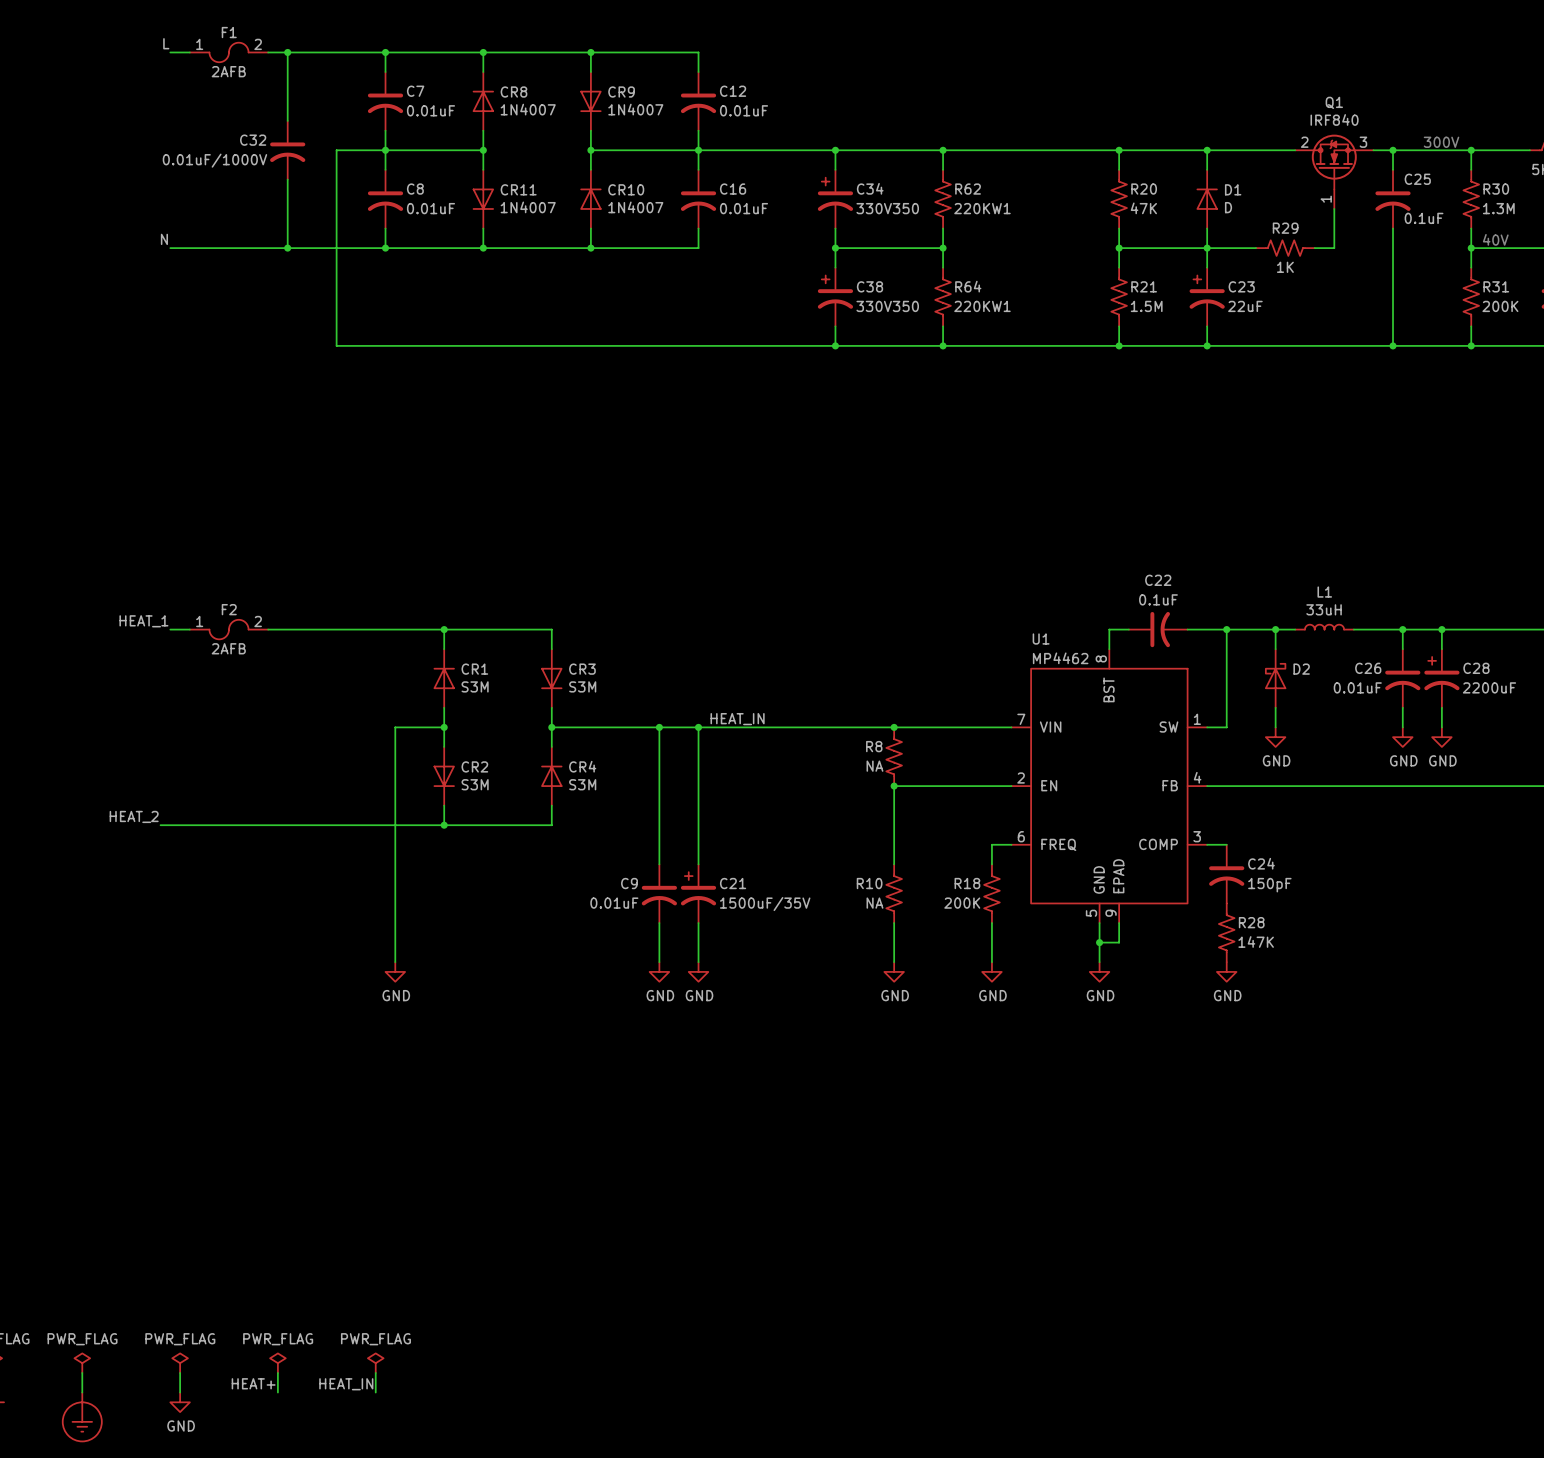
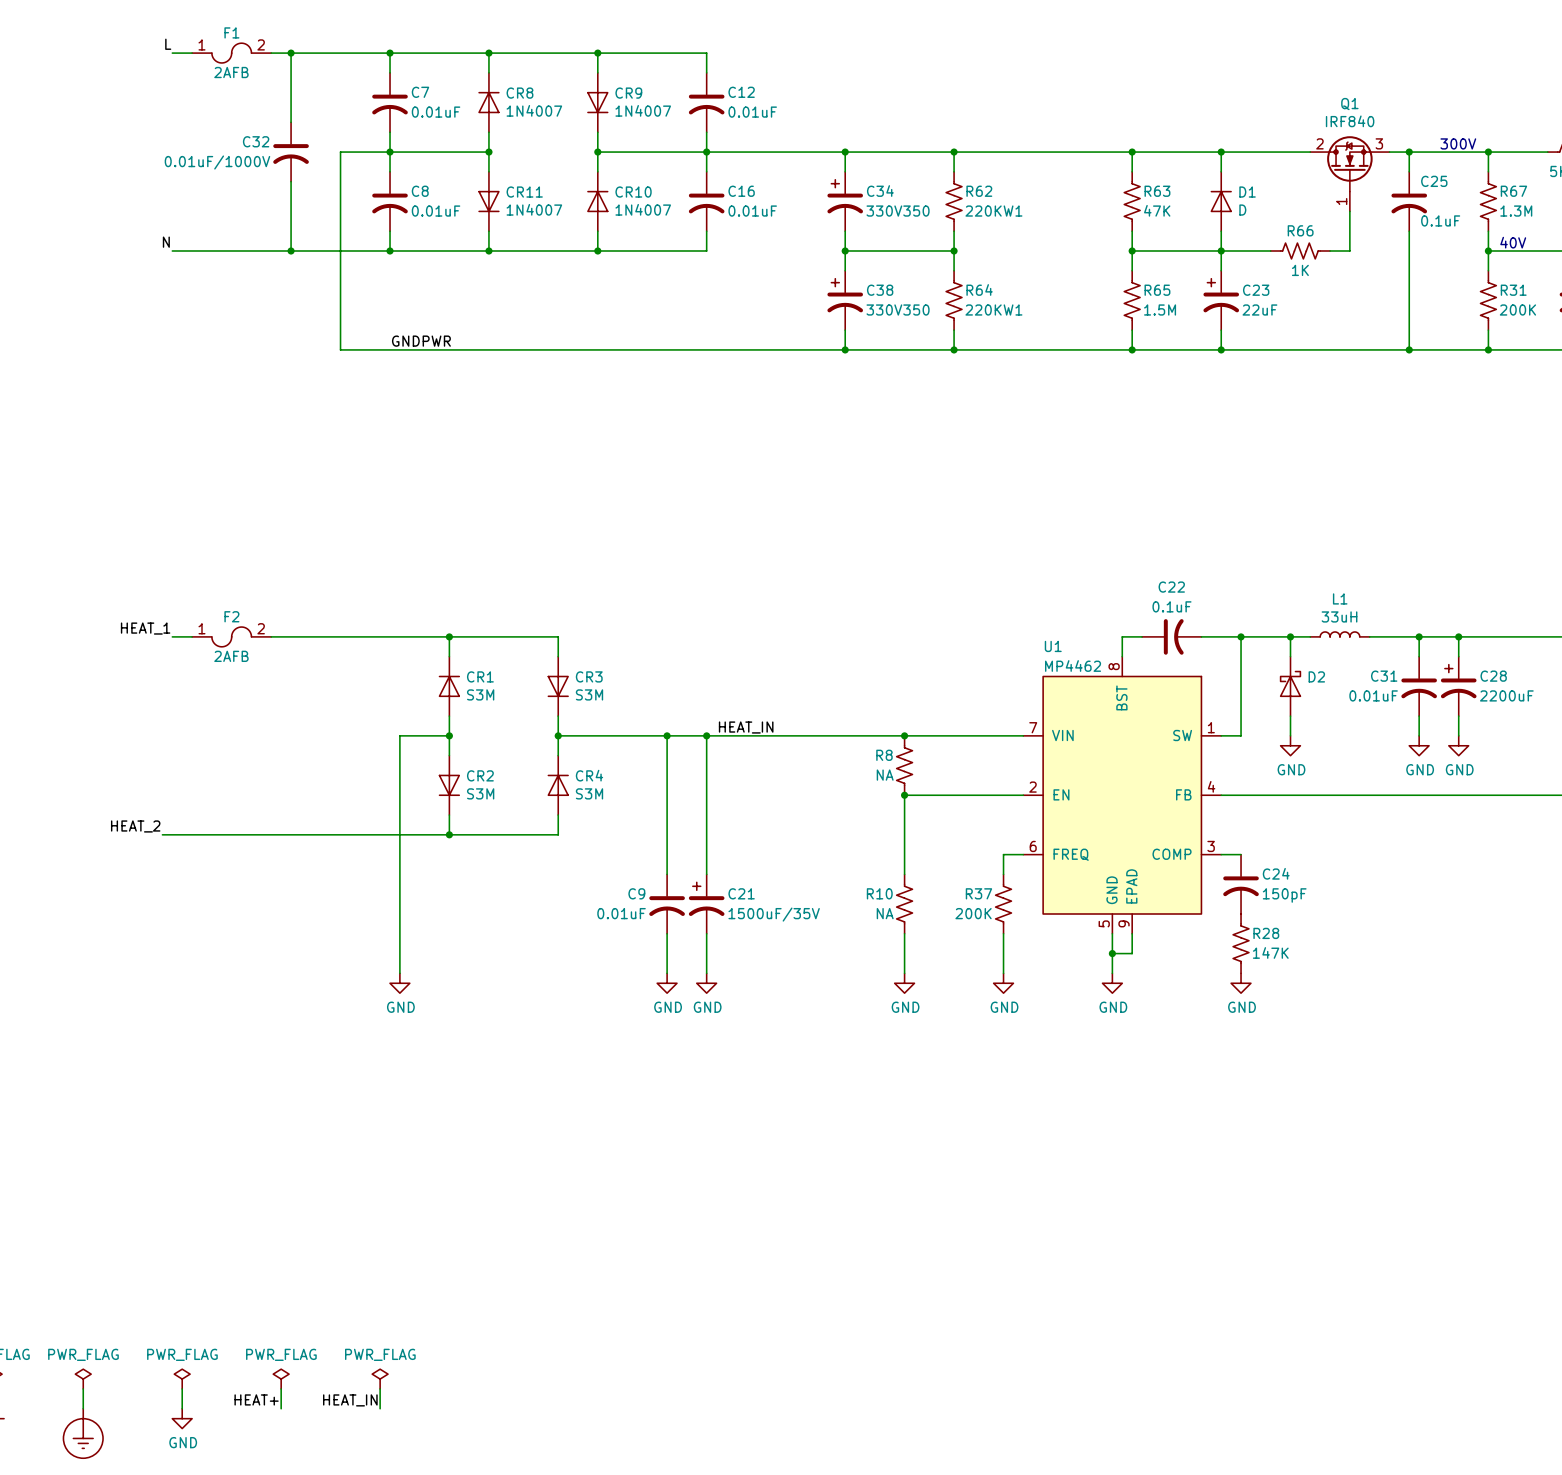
R20 name: R20 (1144, 189) -> R63 (1157, 191)
R30 name: R30 (1496, 189) -> R67 (1513, 191)
R29 name: R29 (1285, 228) -> R66 (1300, 230)
R21 name: R21 (1144, 286) -> R65 (1157, 290)
label: none -> GNDPWR (421, 341)
C26 name: C26 (1368, 668) -> C31 (1384, 676)
R18 name: R18 (967, 883) -> R37 (978, 893)

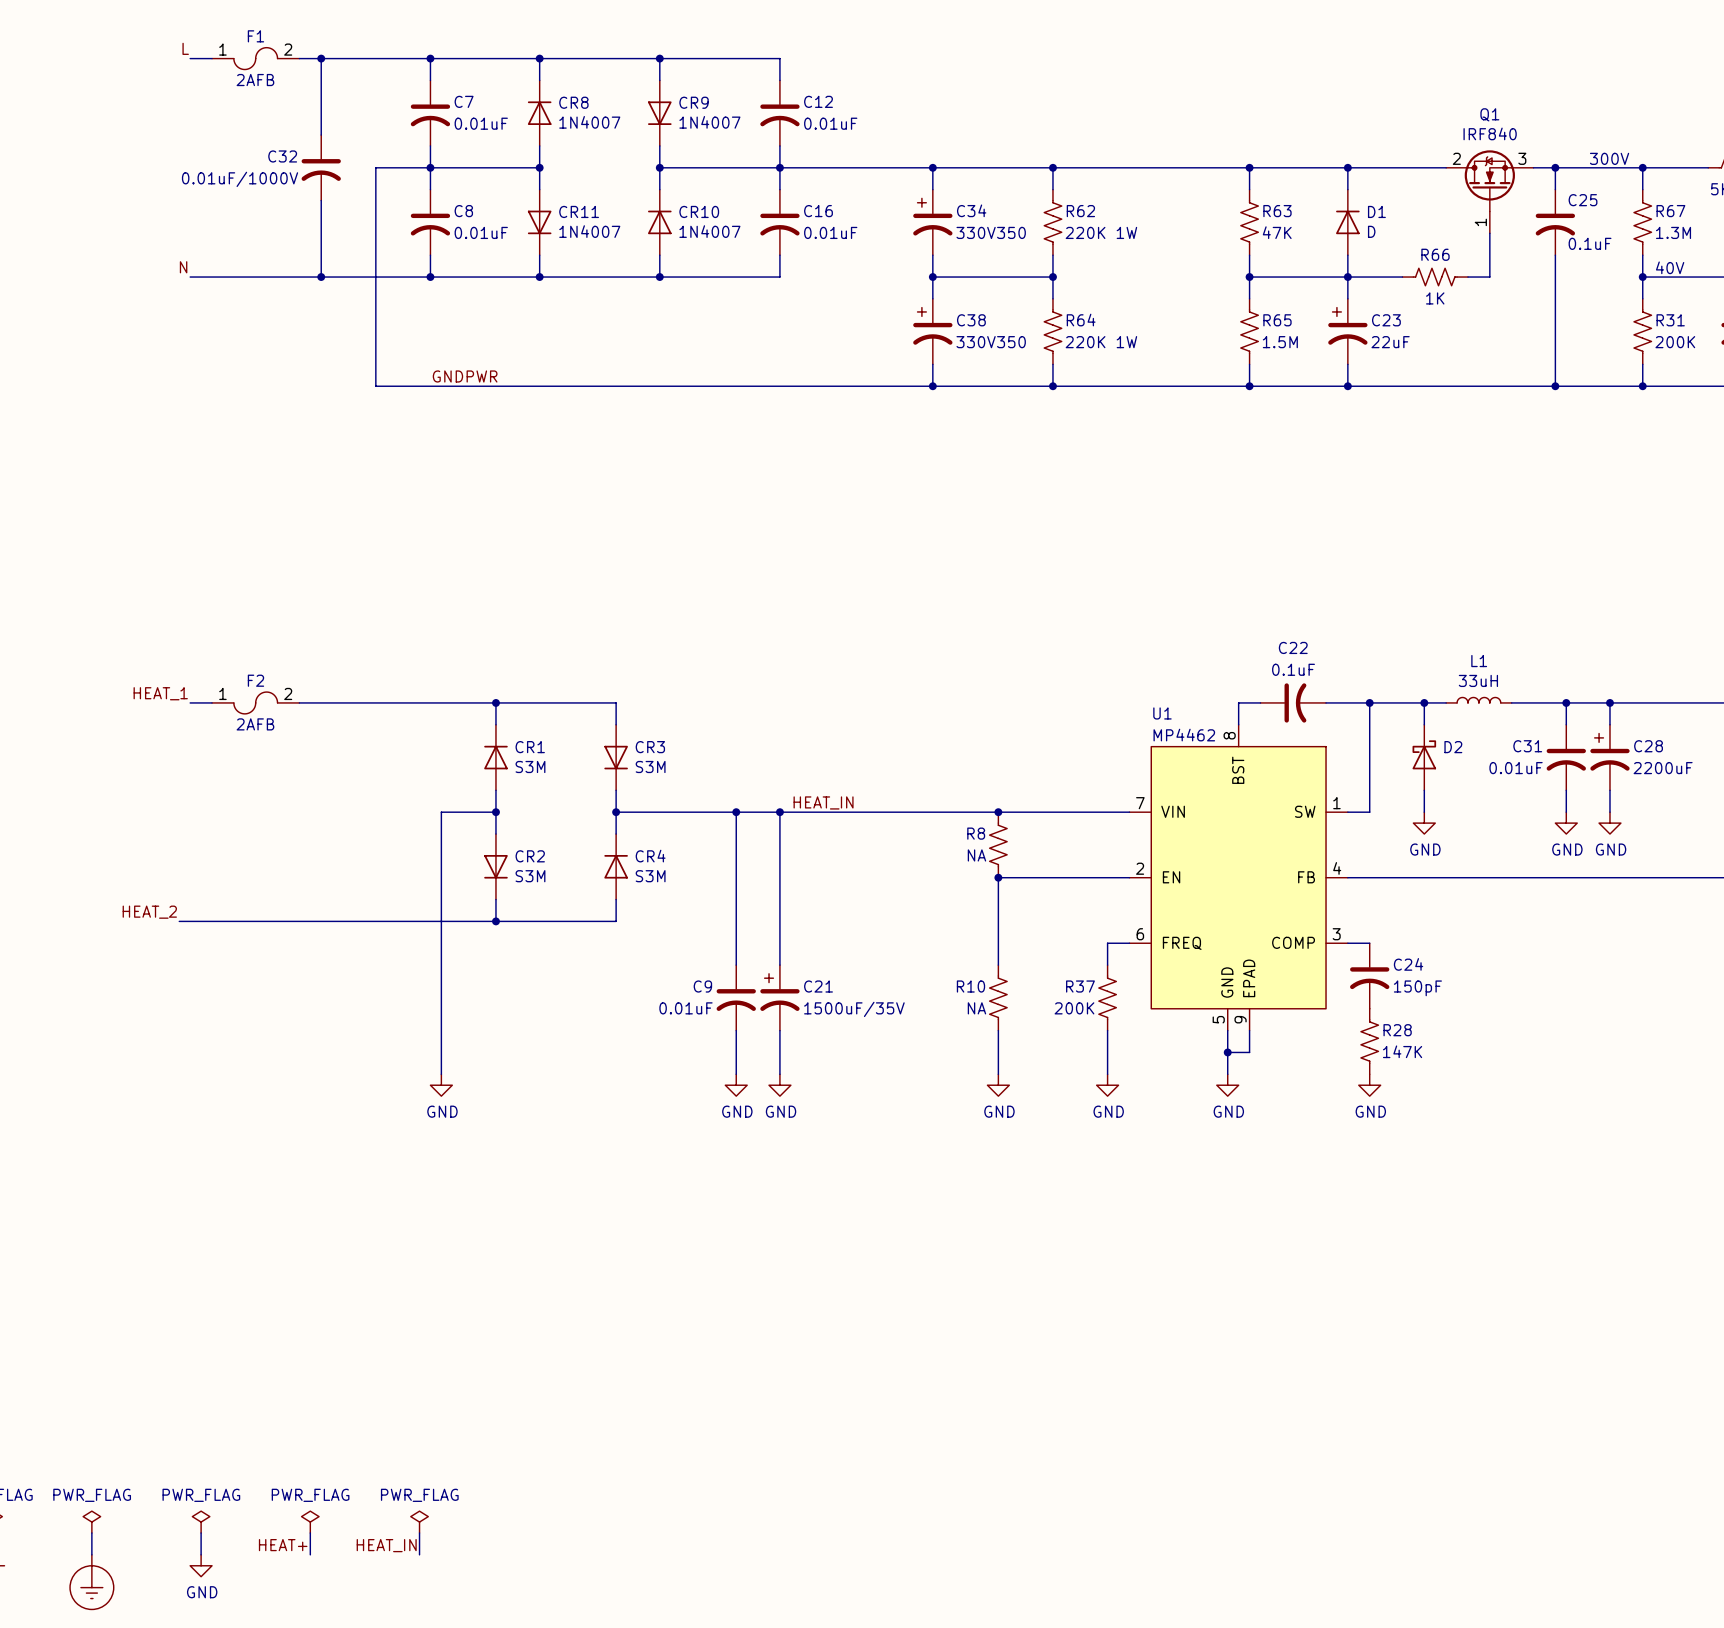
R62 value: 220KW1 (993, 211) -> 220K 1W (1101, 232)
R64 value: 220KW1 (993, 310) -> 220K 1W (1101, 342)

